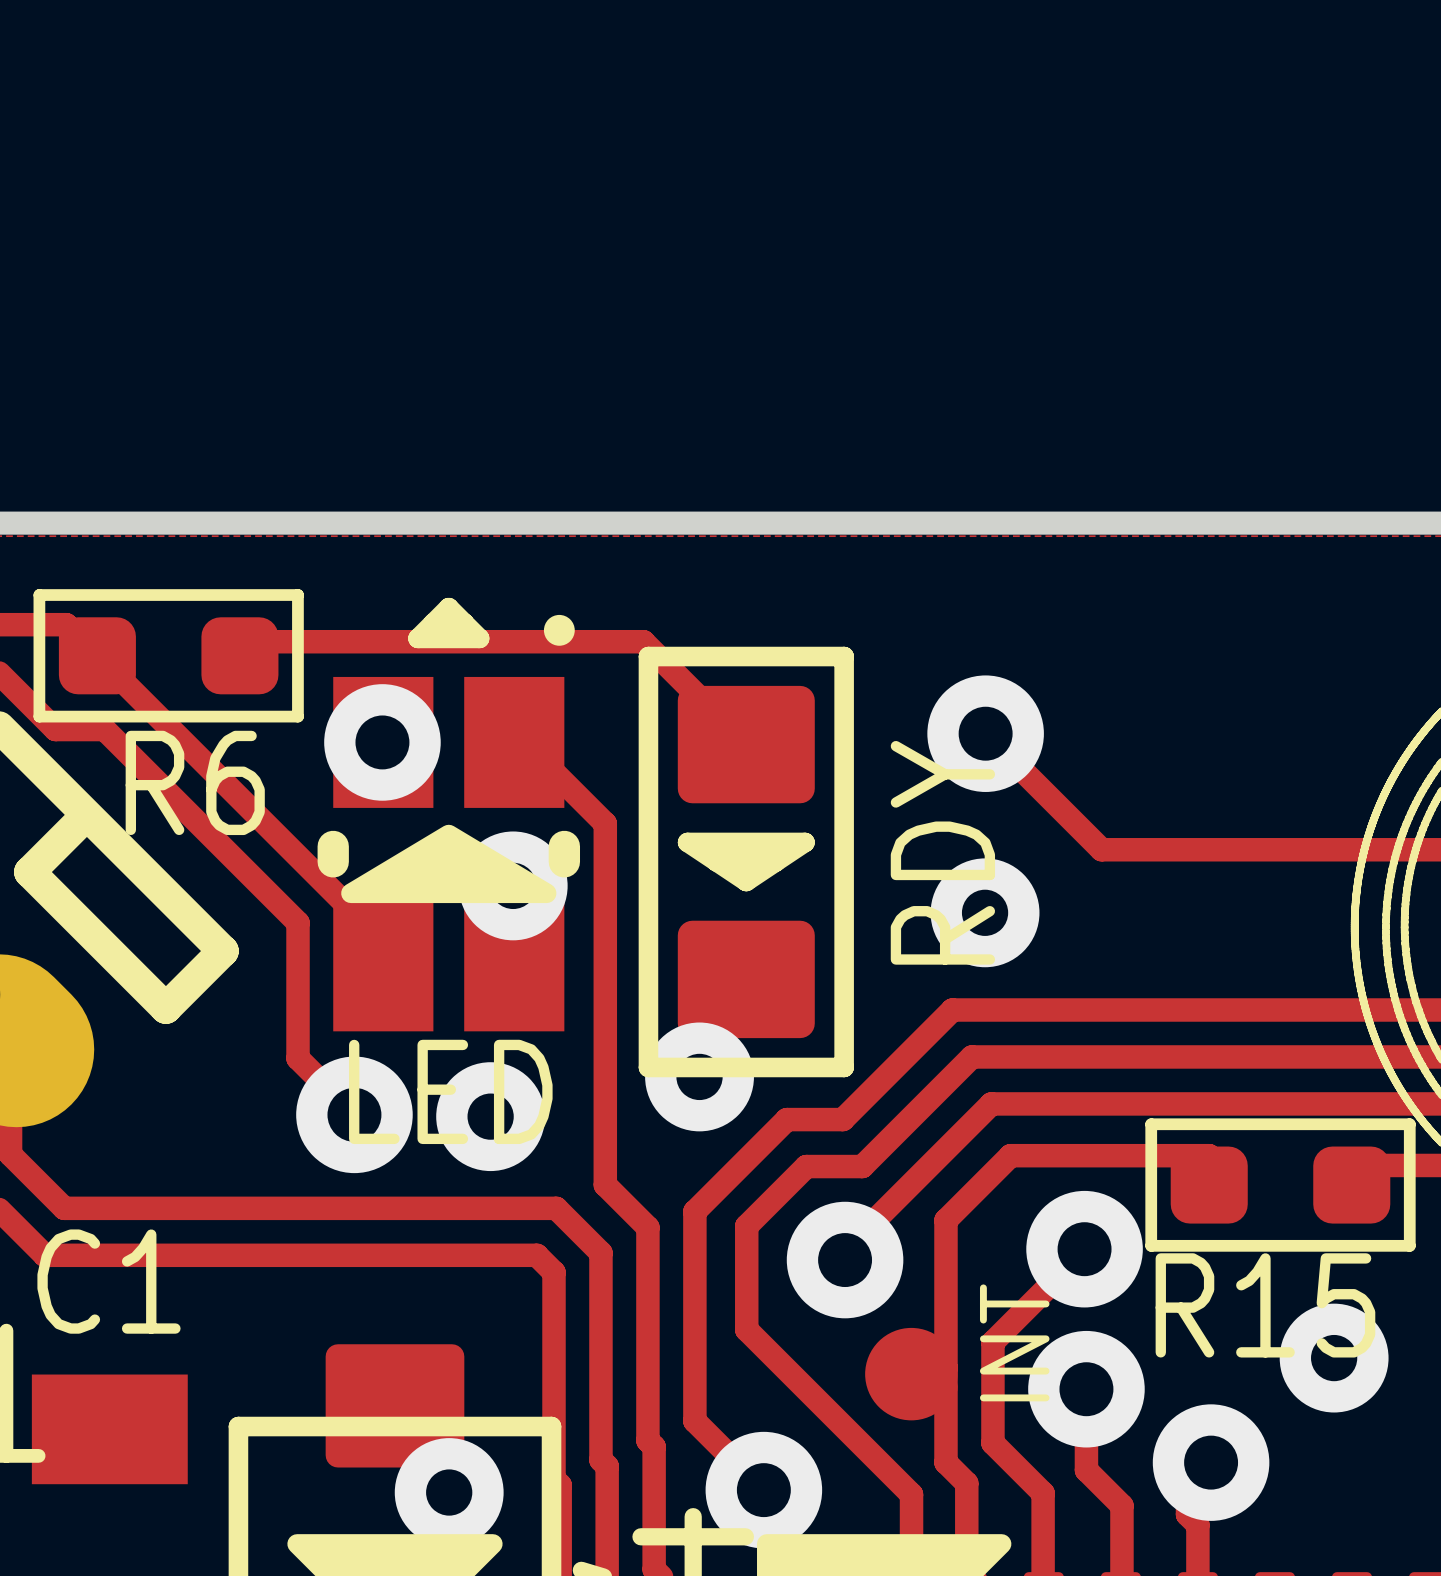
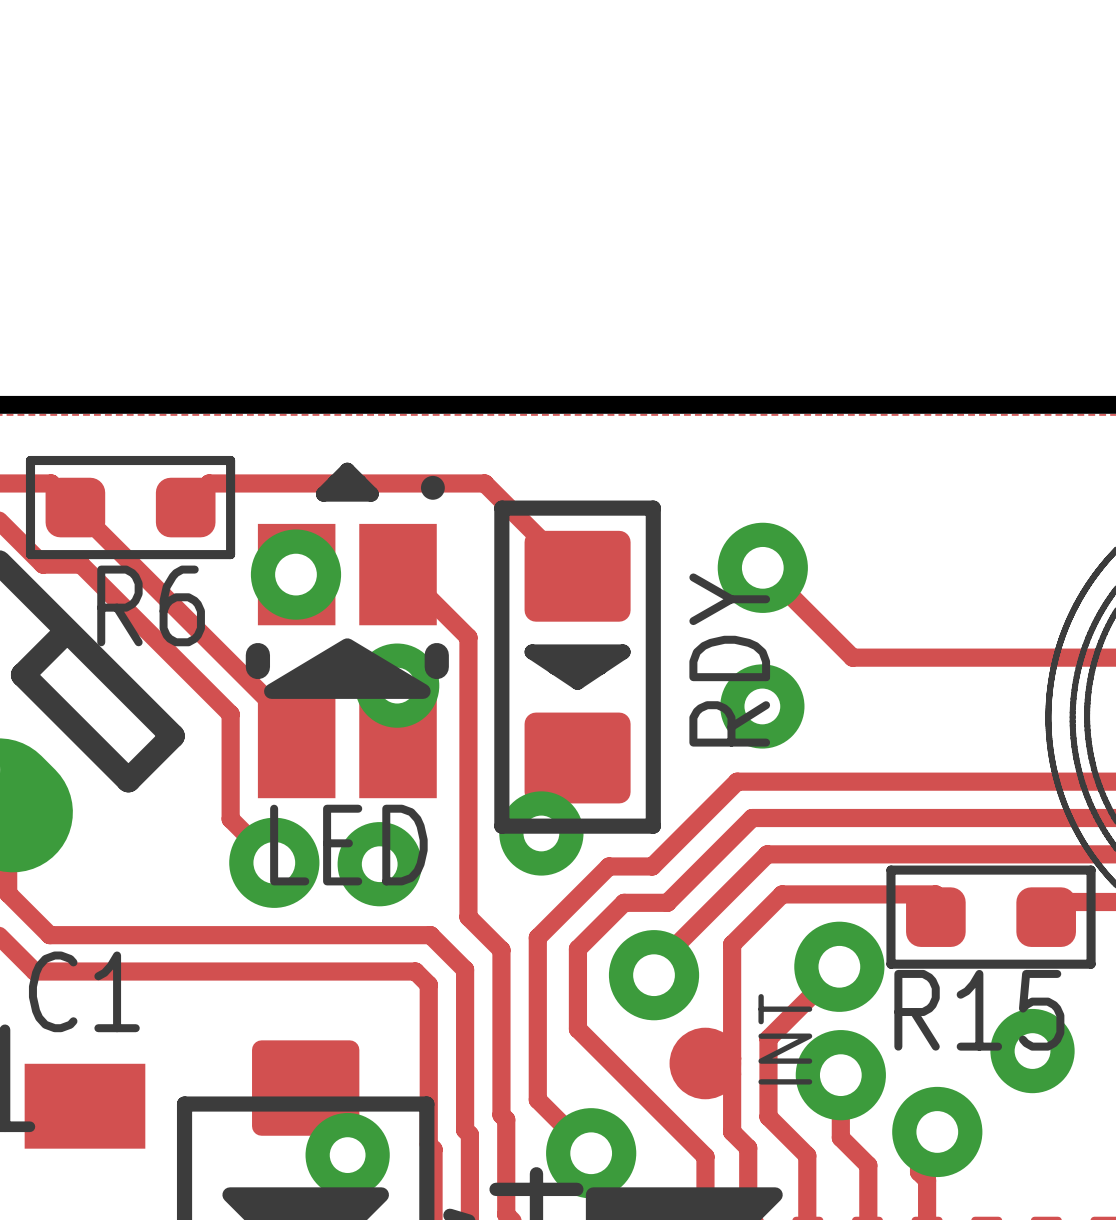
track: (643, 641) (239, 641) (239, 655) -> (497, 496) (484, 483) (209, 483) (186, 505)

